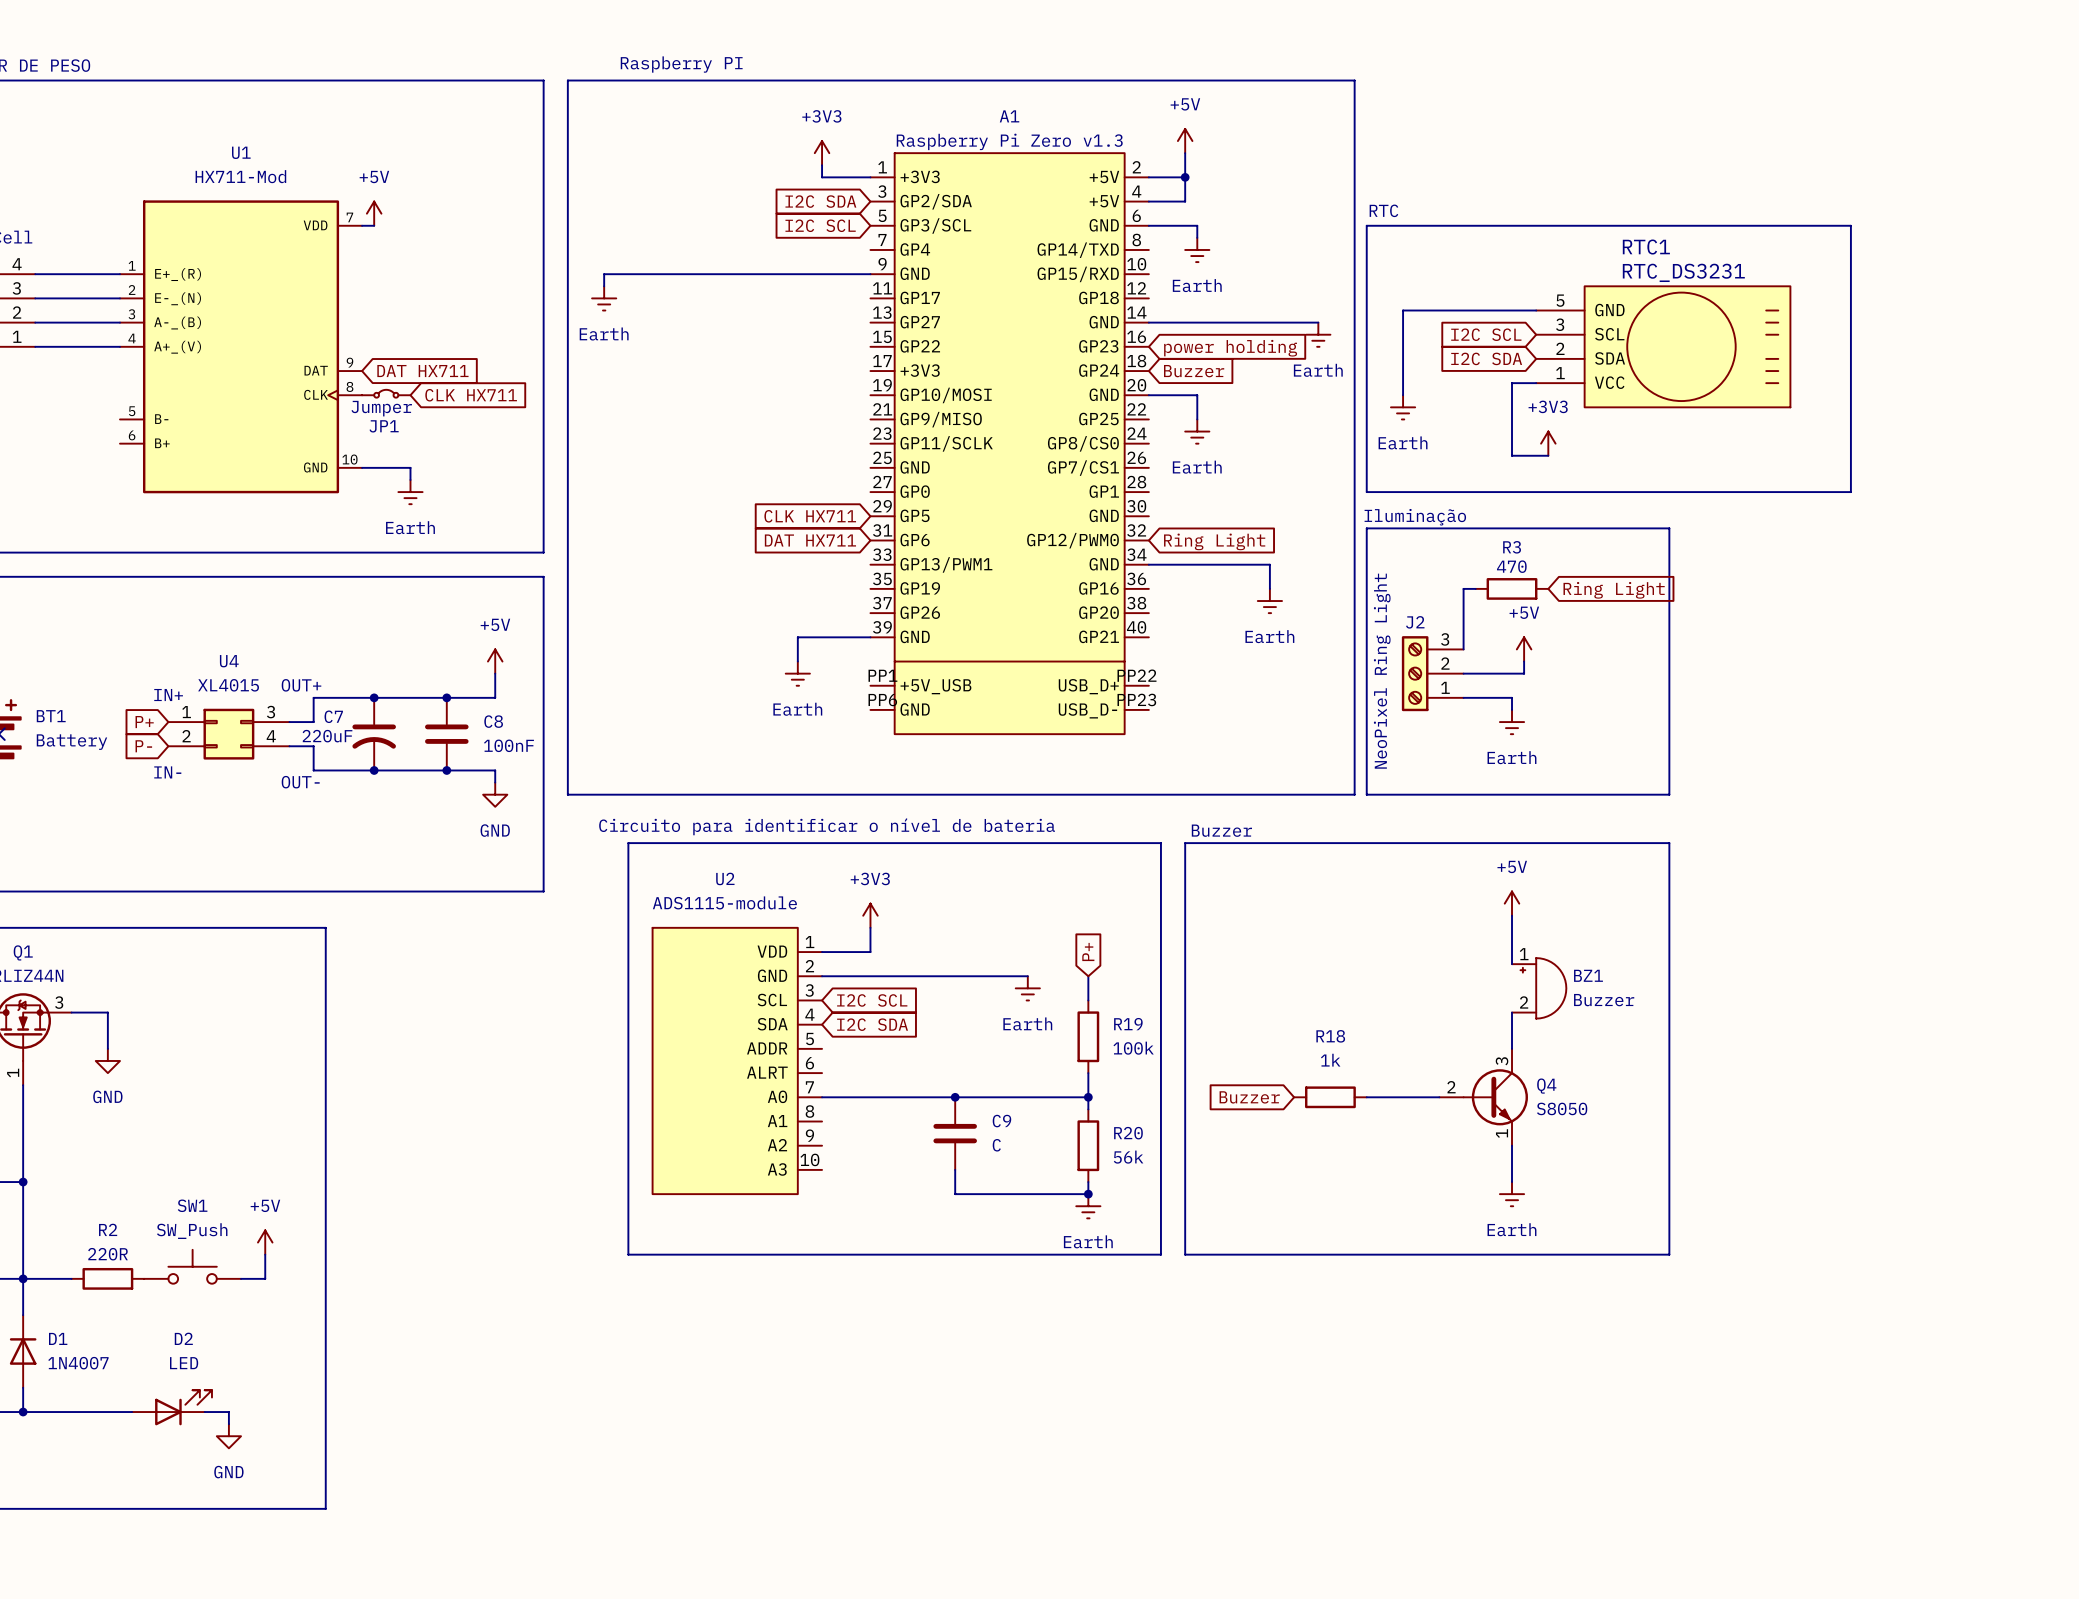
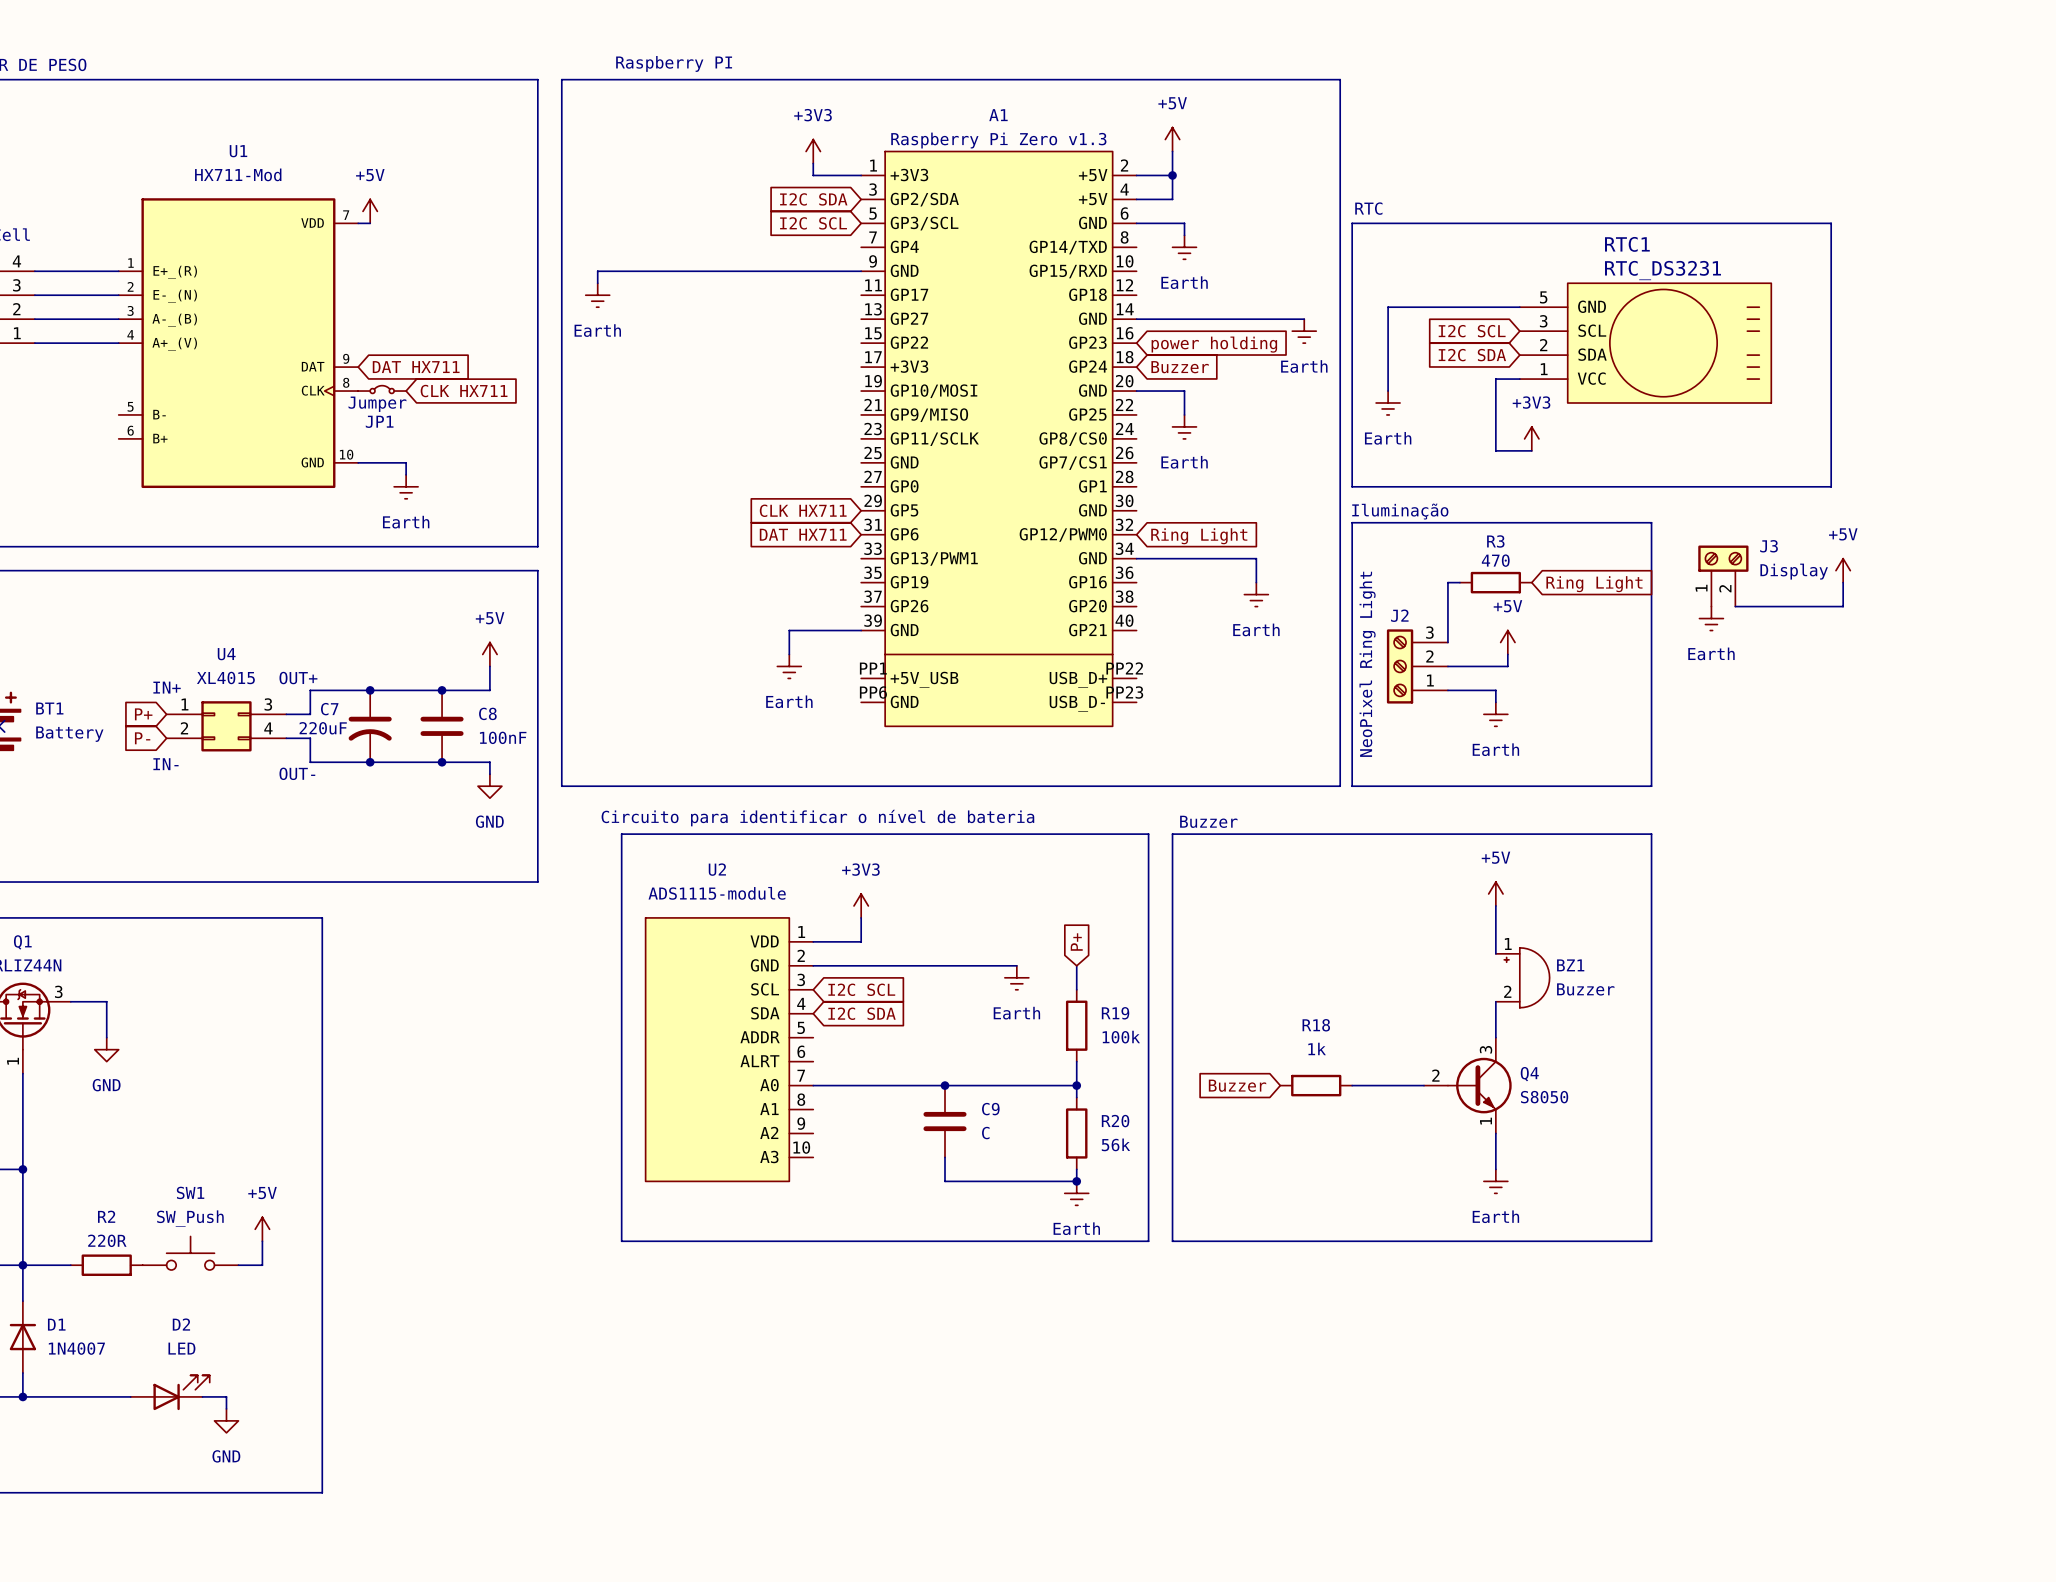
power symbol: none -> +5V (1843, 570)
J3: none -> Display (1723, 576)
wire: none -> (1843, 582) (1843, 606) (1735, 606)
power symbol: none -> Earth (1711, 618)

